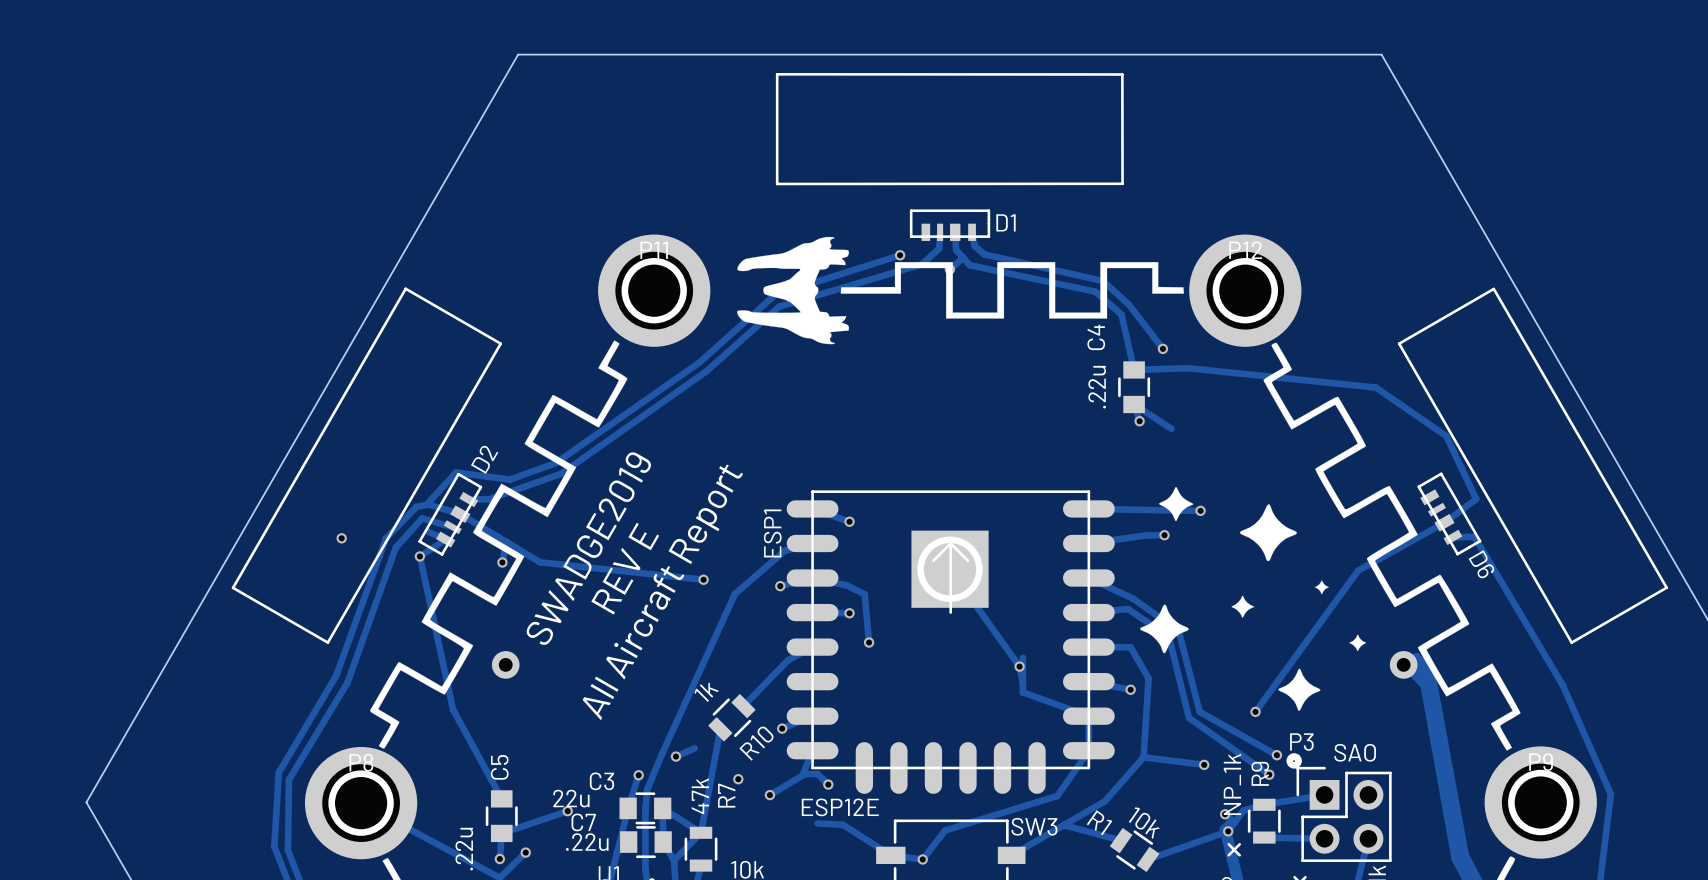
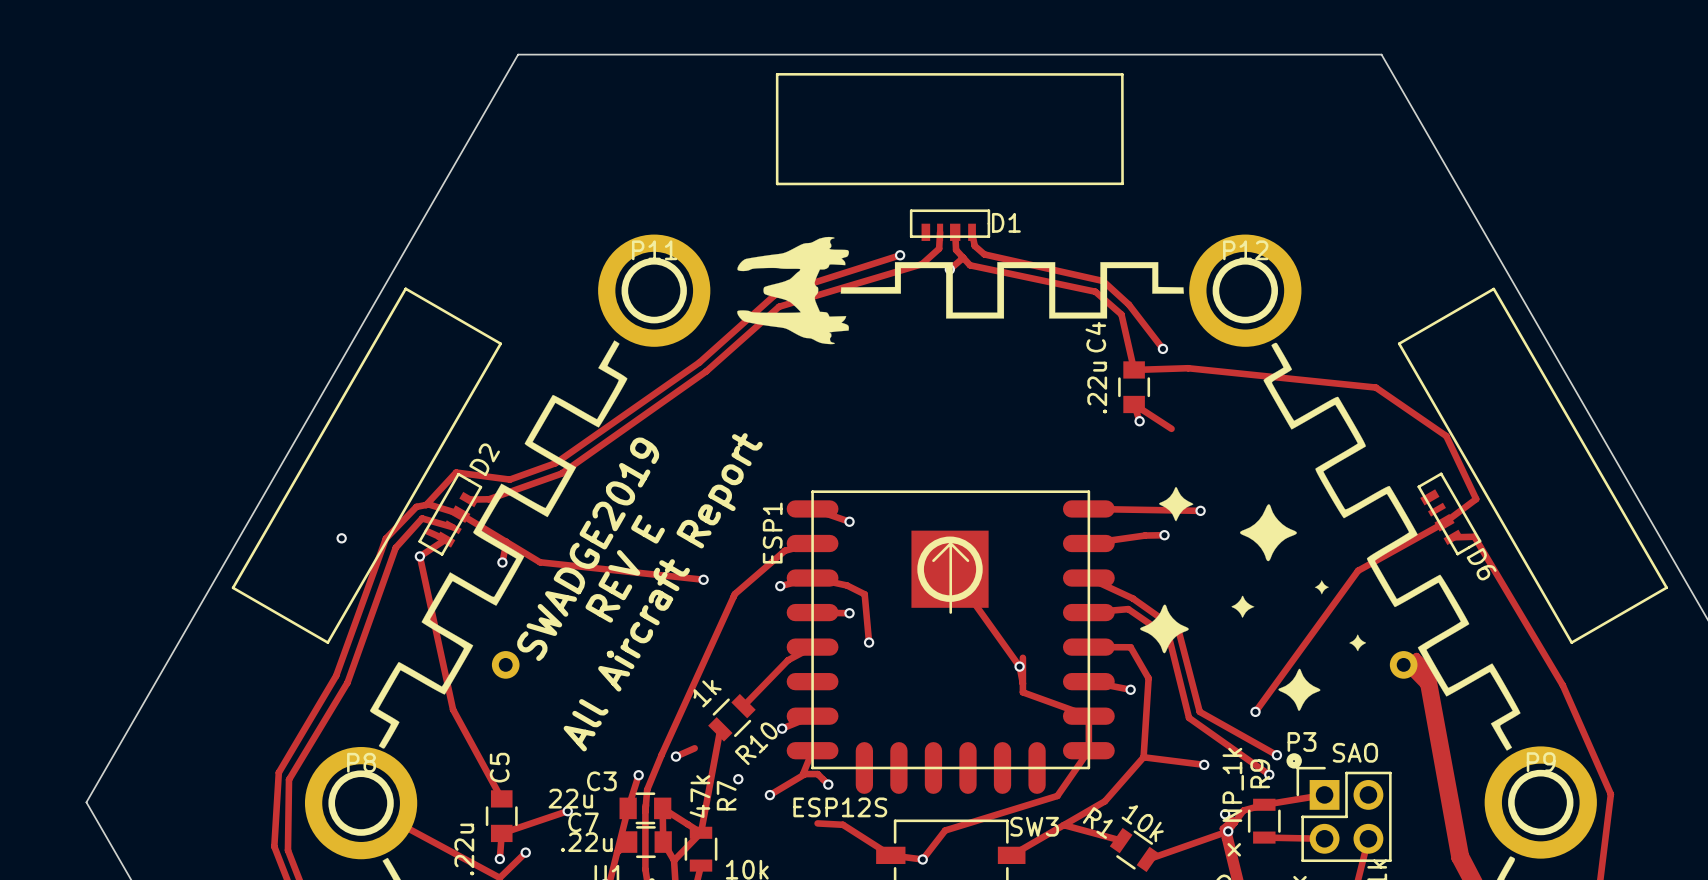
ESP1 value: ESP12E (840, 807) -> ESP12S (840, 807)

